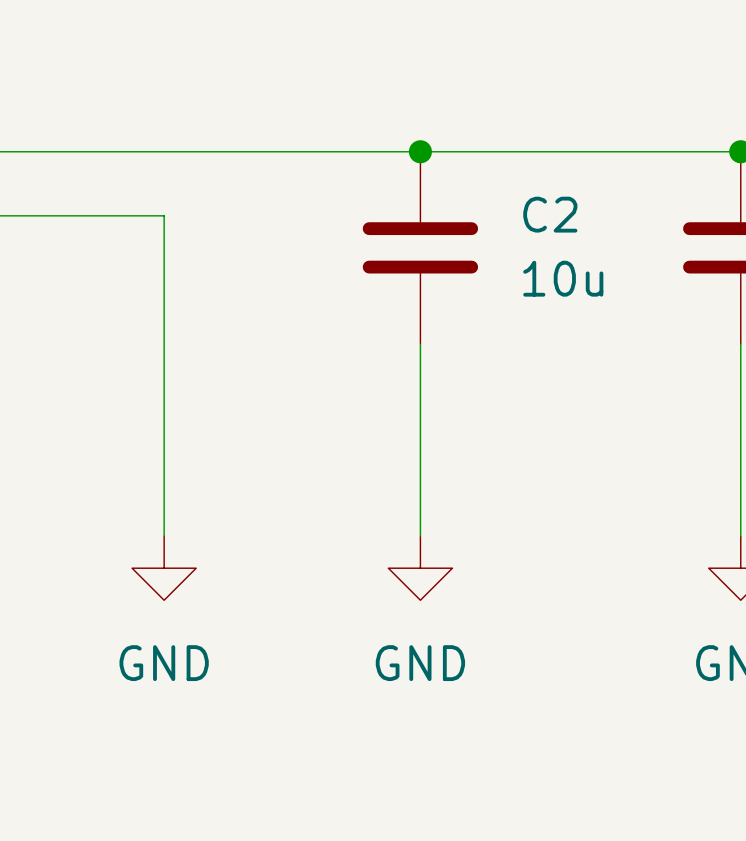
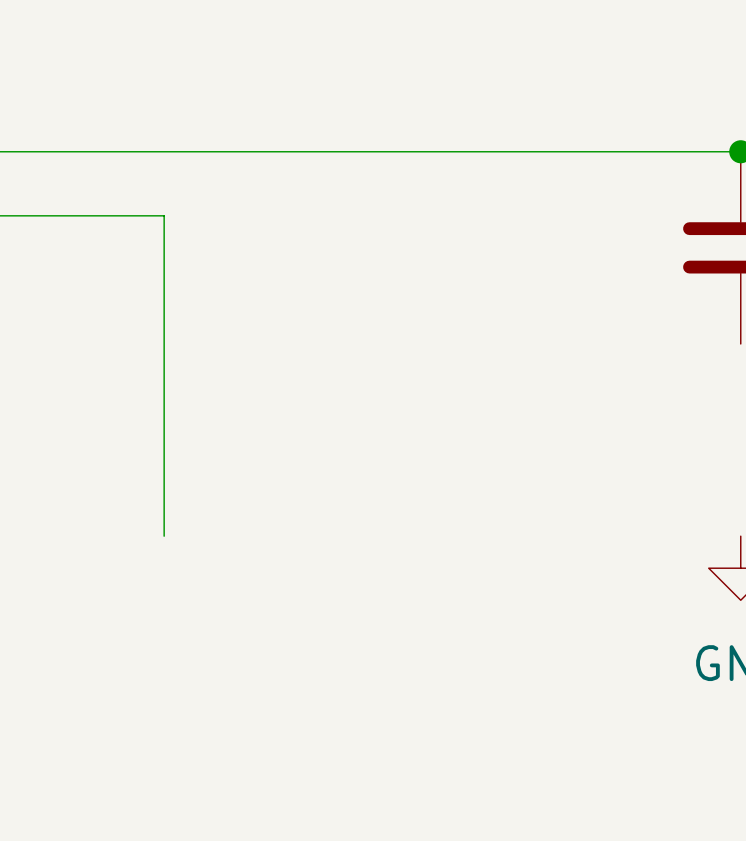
junction: (420, 151) -> none
C2: 10u (420, 247) -> none
wire: (420, 343) (420, 536) -> none
wire: (740, 343) (740, 536) -> none
power symbol: GND (164, 568) -> none
power symbol: GND (420, 568) -> none

